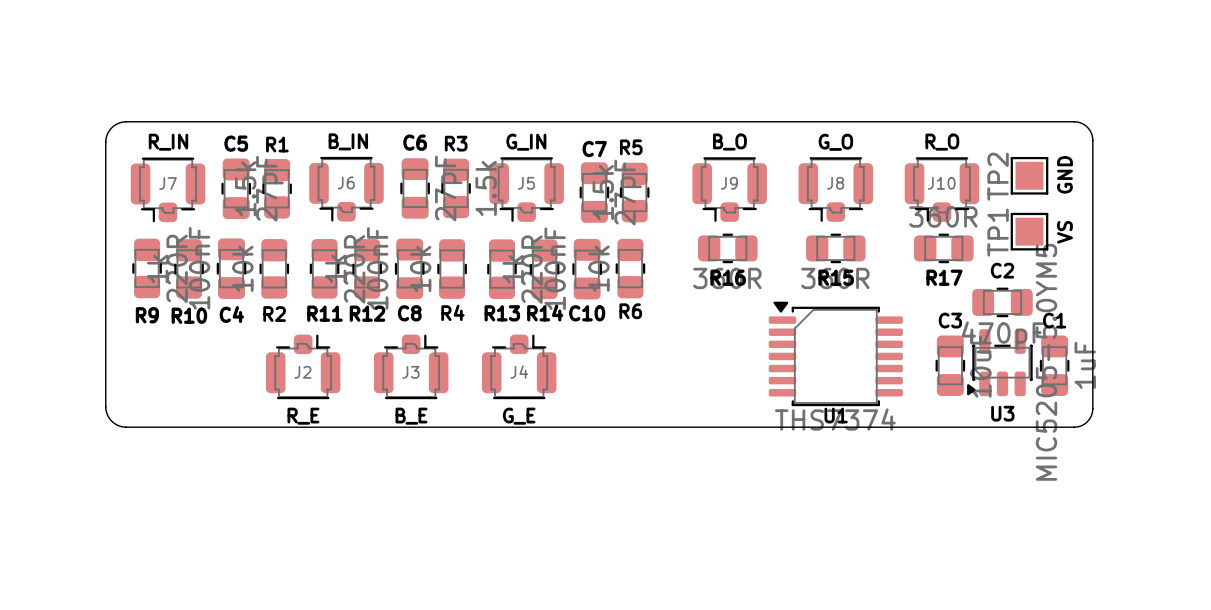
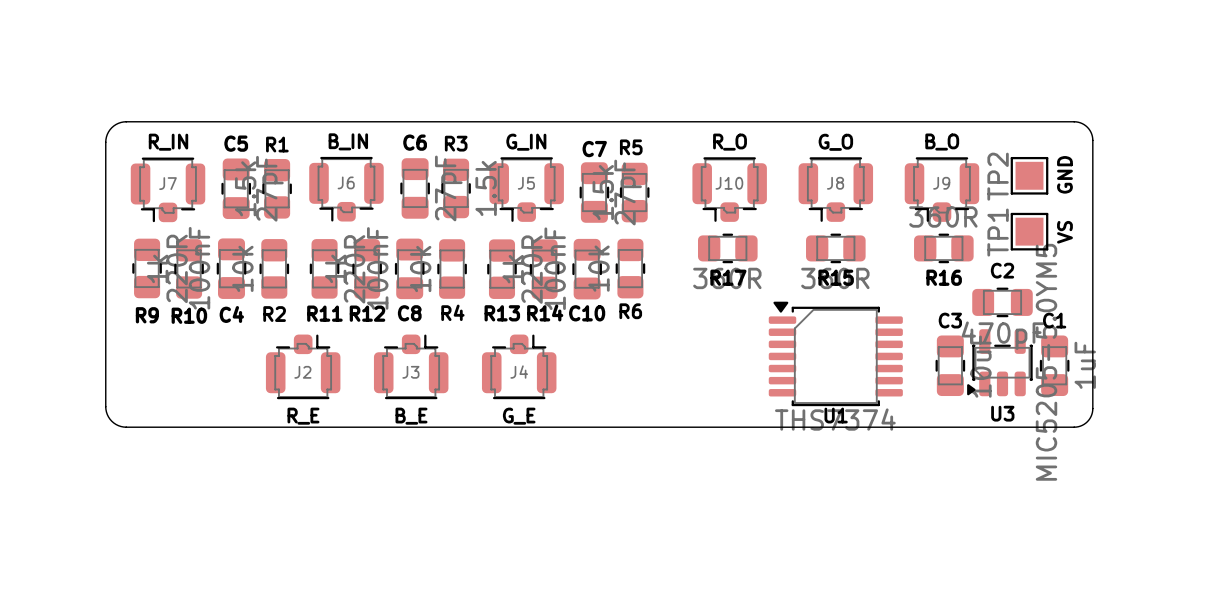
J9 value: B_O (729, 142) -> R_O (730, 142)
J10 value: R_O (942, 142) -> B_O (942, 142)
J9 name: J9 (729, 183) -> J10 (729, 183)
J10 name: J10 (941, 183) -> J9 (941, 183)
R16 name: R16 (728, 277) -> R17 (728, 277)
R17 name: R17 (944, 277) -> R16 (944, 277)

